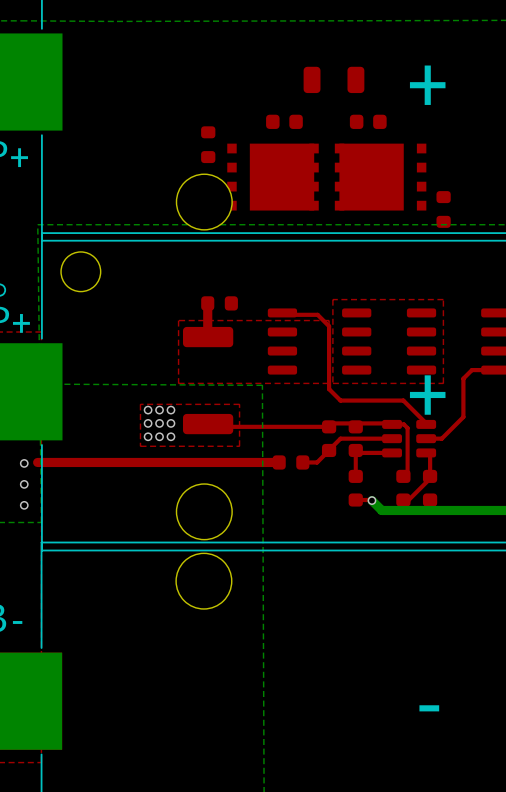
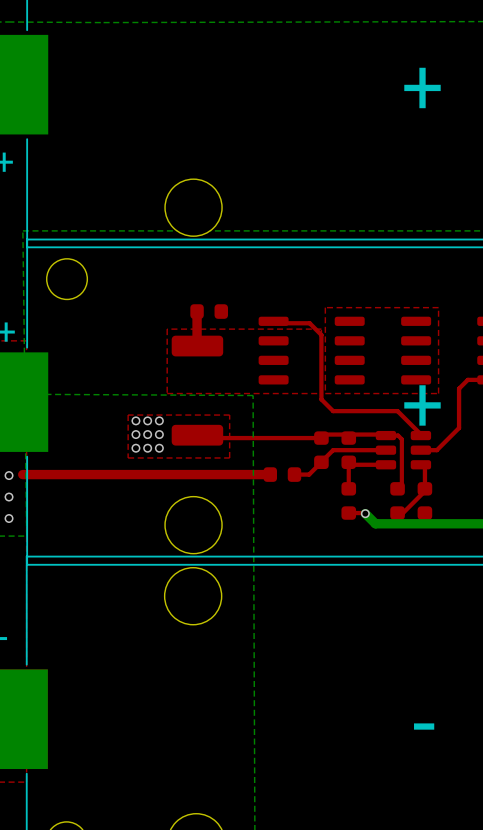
part: (333, 79) -> none
part: (284, 121) -> none
part: (368, 121) -> none
part: (208, 144) -> none
part: (273, 177) -> none
part: (380, 177) -> none
part: (443, 209) -> none

